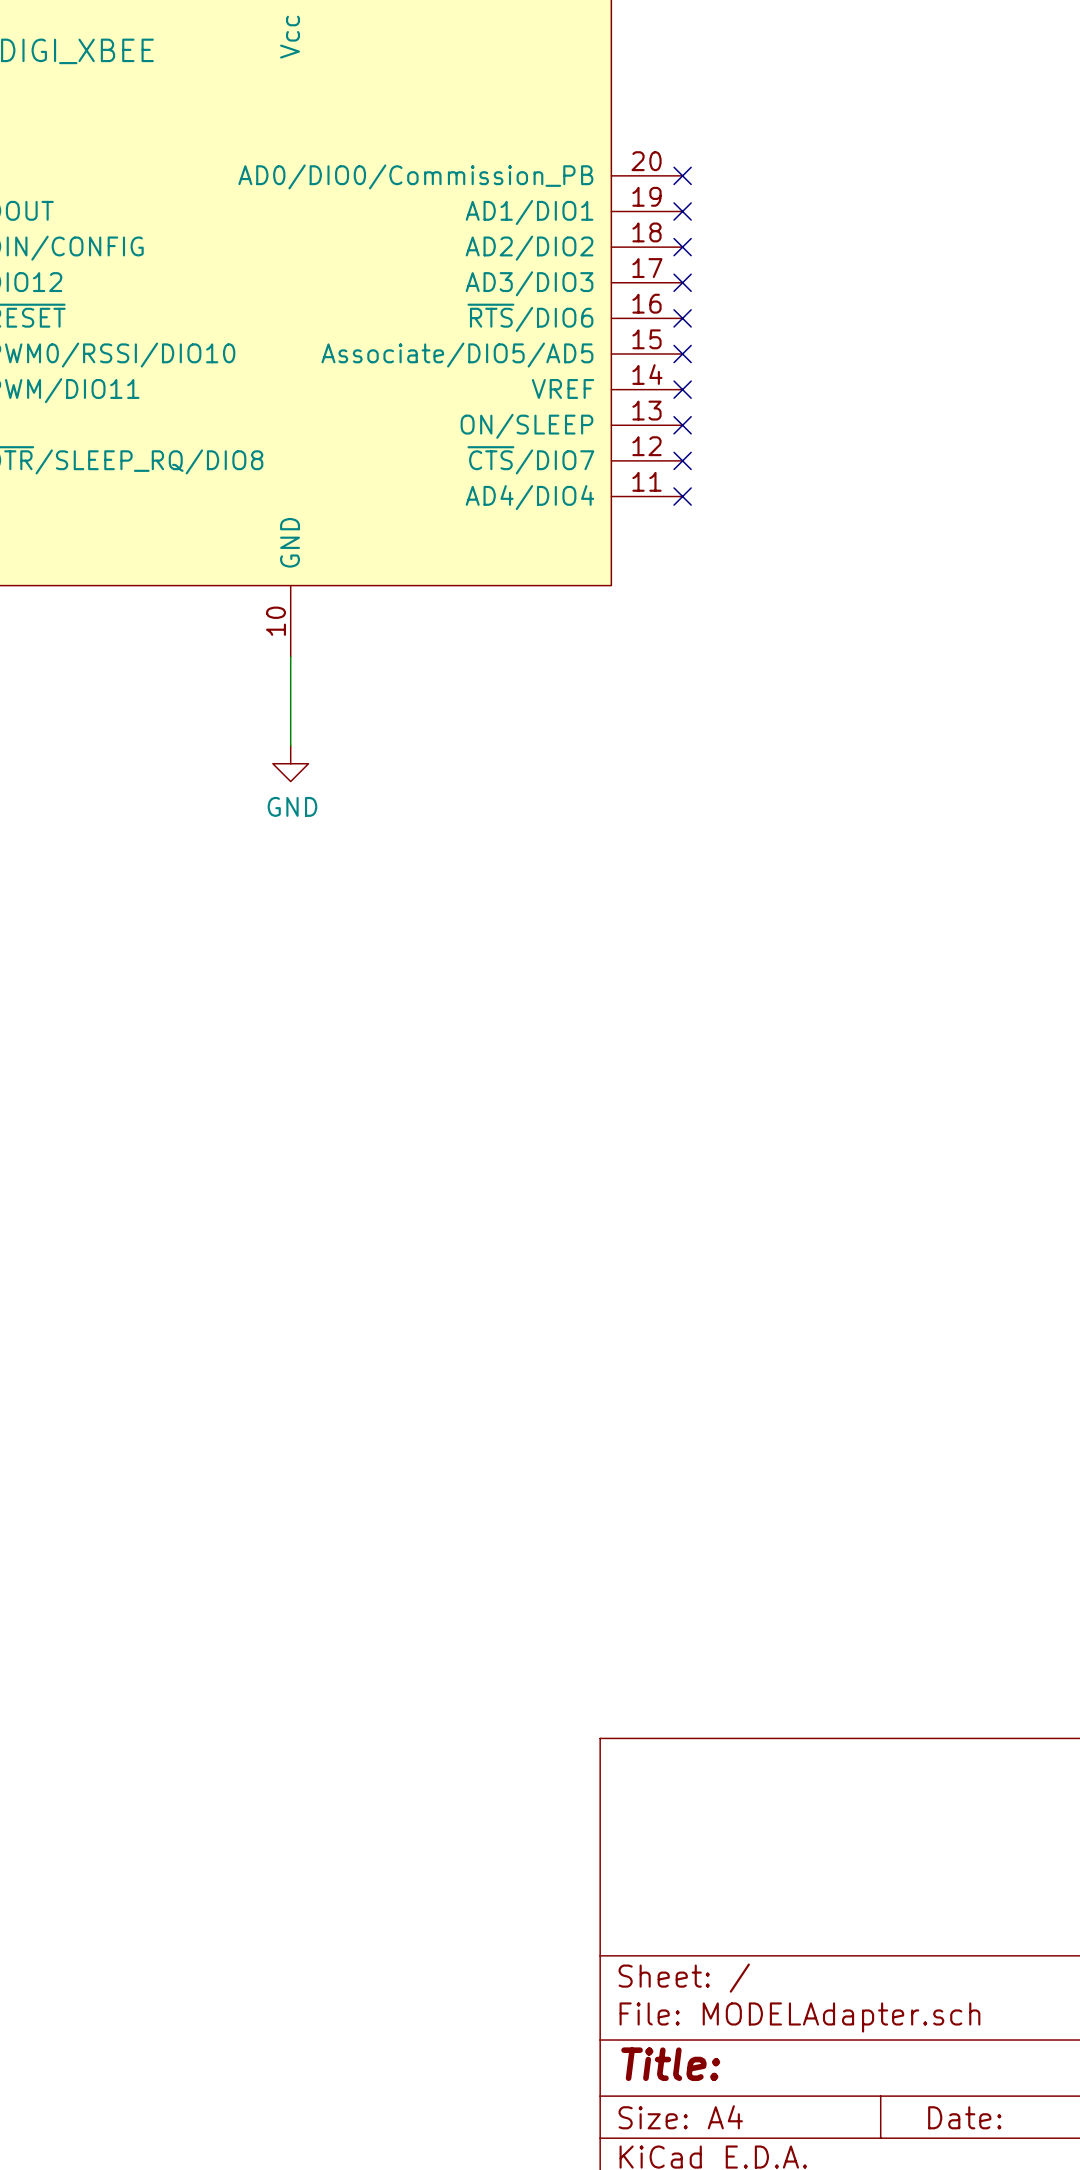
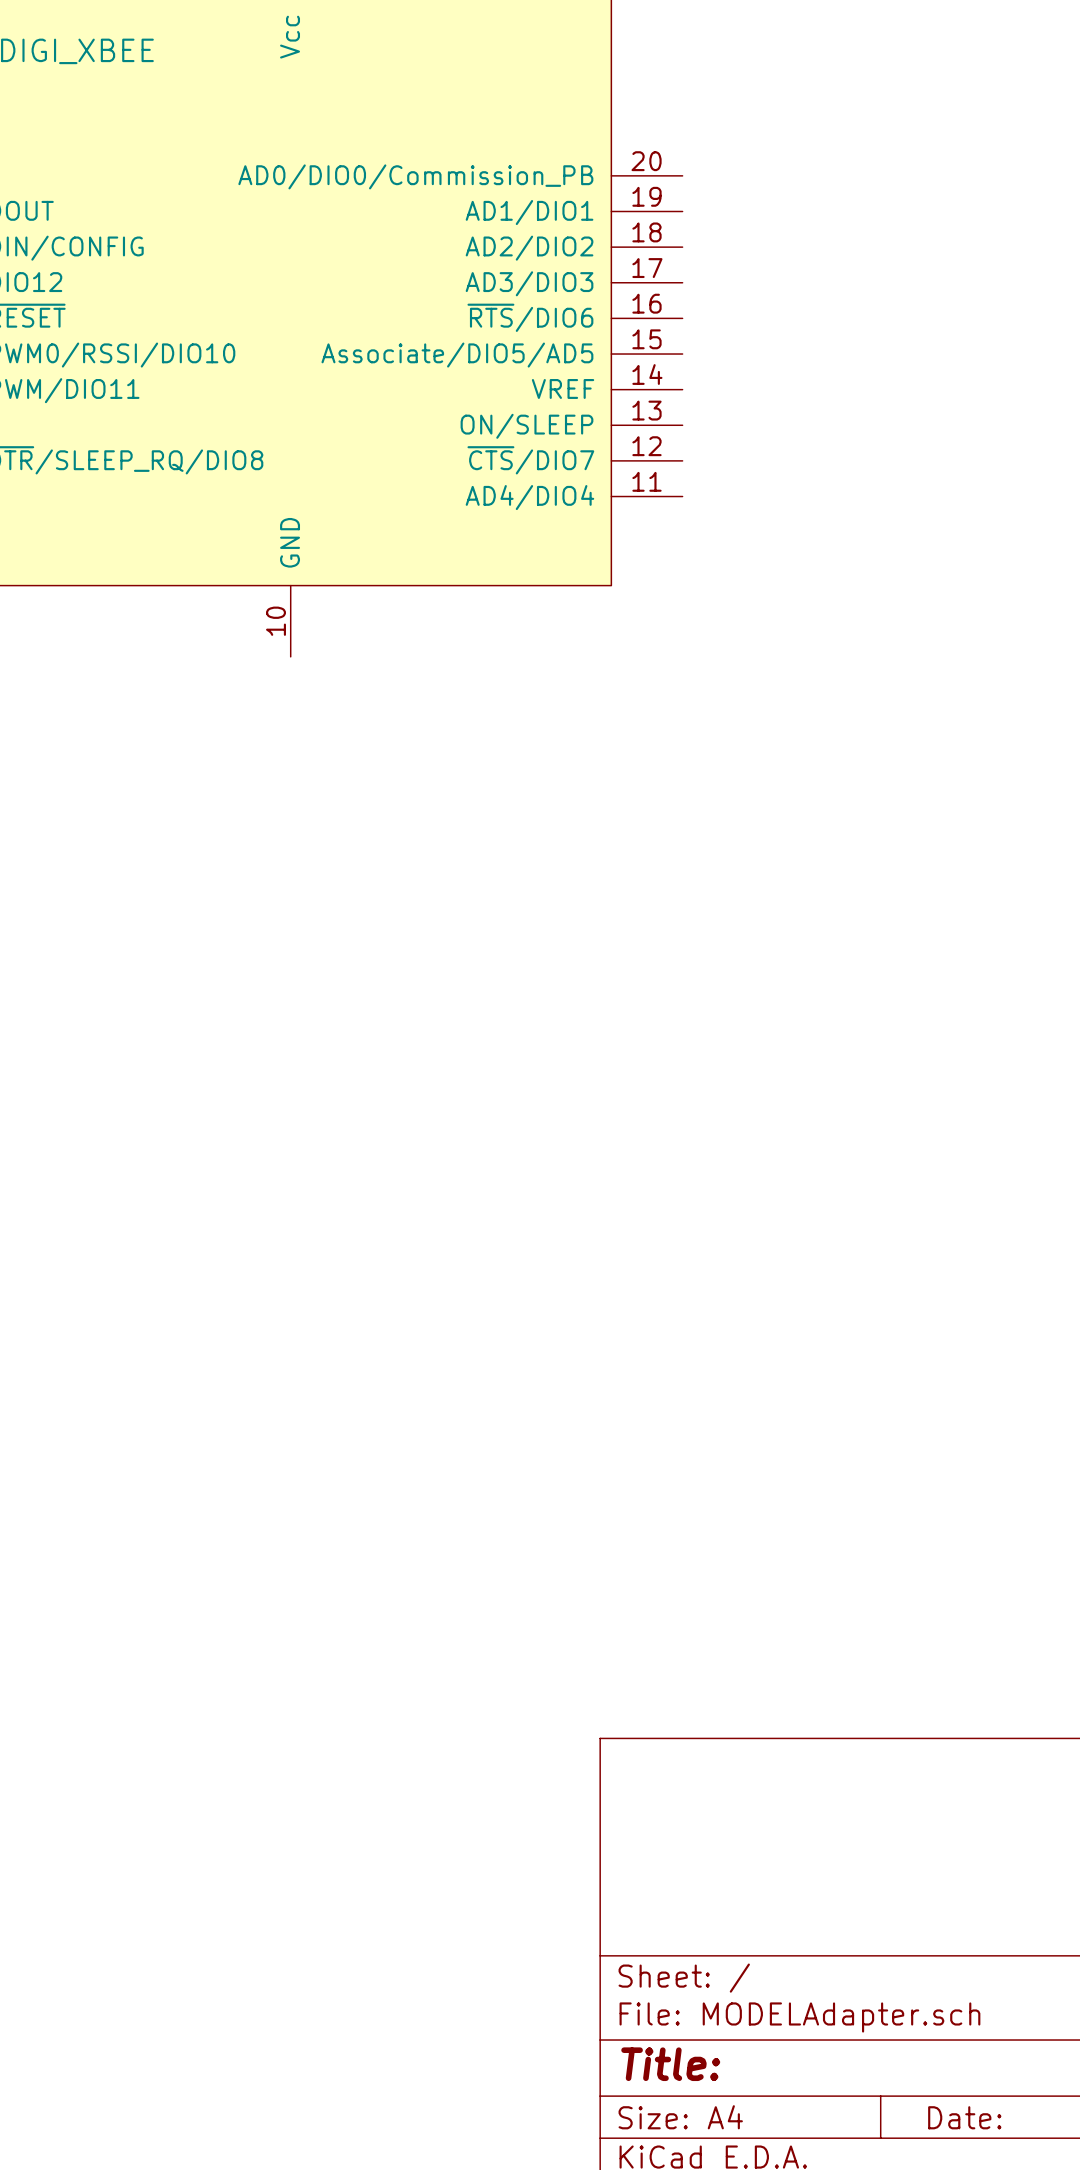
no-connect mark: (682, 175) -> none
no-connect mark: (682, 211) -> none
no-connect mark: (682, 247) -> none
no-connect mark: (682, 282) -> none
no-connect mark: (682, 318) -> none
no-connect mark: (682, 354) -> none
no-connect mark: (682, 389) -> none
no-connect mark: (682, 425) -> none
no-connect mark: (682, 460) -> none
no-connect mark: (682, 496) -> none
wire: (290, 656) (290, 745) -> none
power symbol: GND (290, 763) -> none

